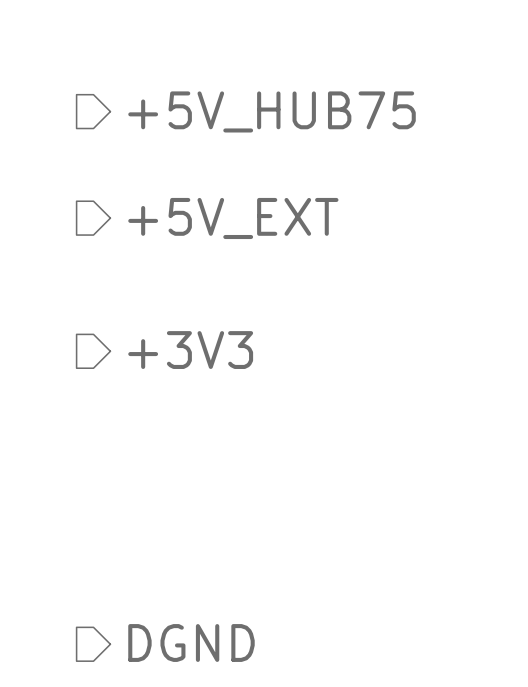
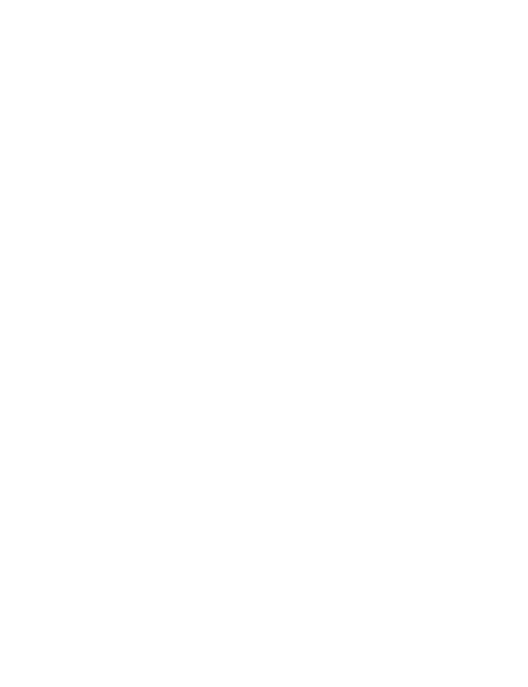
hierarchical label: +5V_HUB75 (272, 111) -> none
hierarchical label: +5V_EXT (233, 218) -> none
hierarchical label: +3V3 (190, 350) -> none
hierarchical label: DGND (191, 643) -> none

